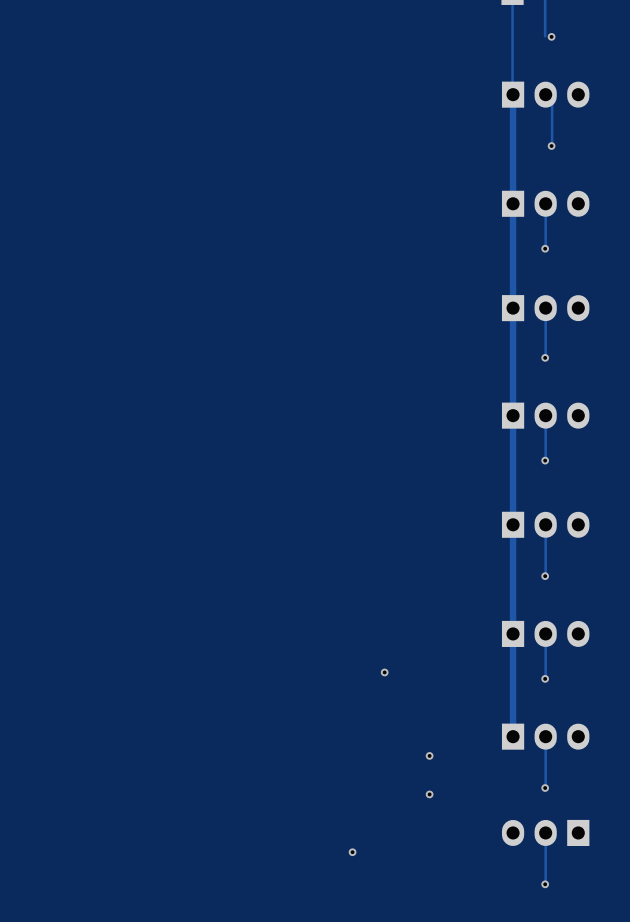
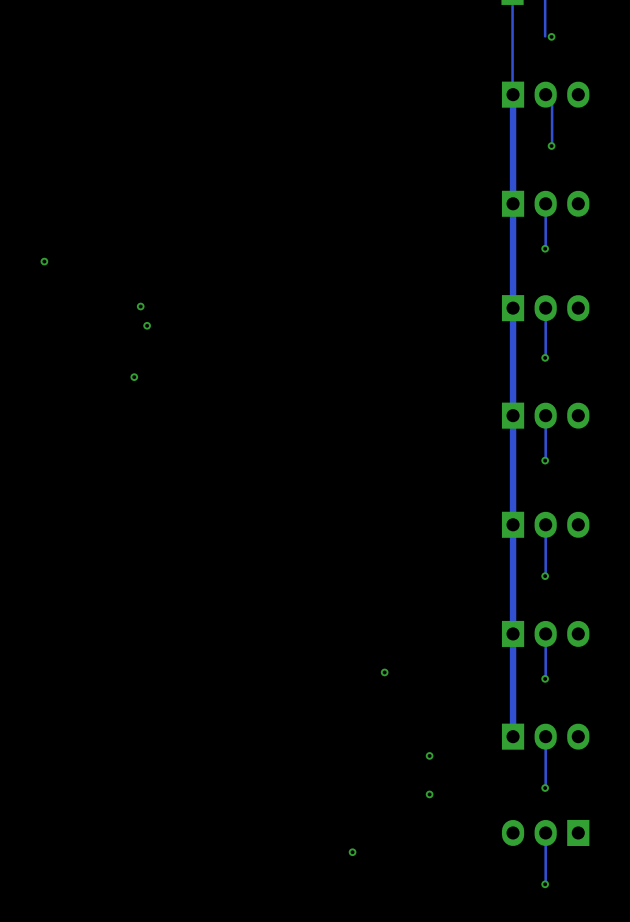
via: none -> (44, 261)
via: none -> (140, 306)
via: none -> (147, 325)
via: none -> (134, 377)

